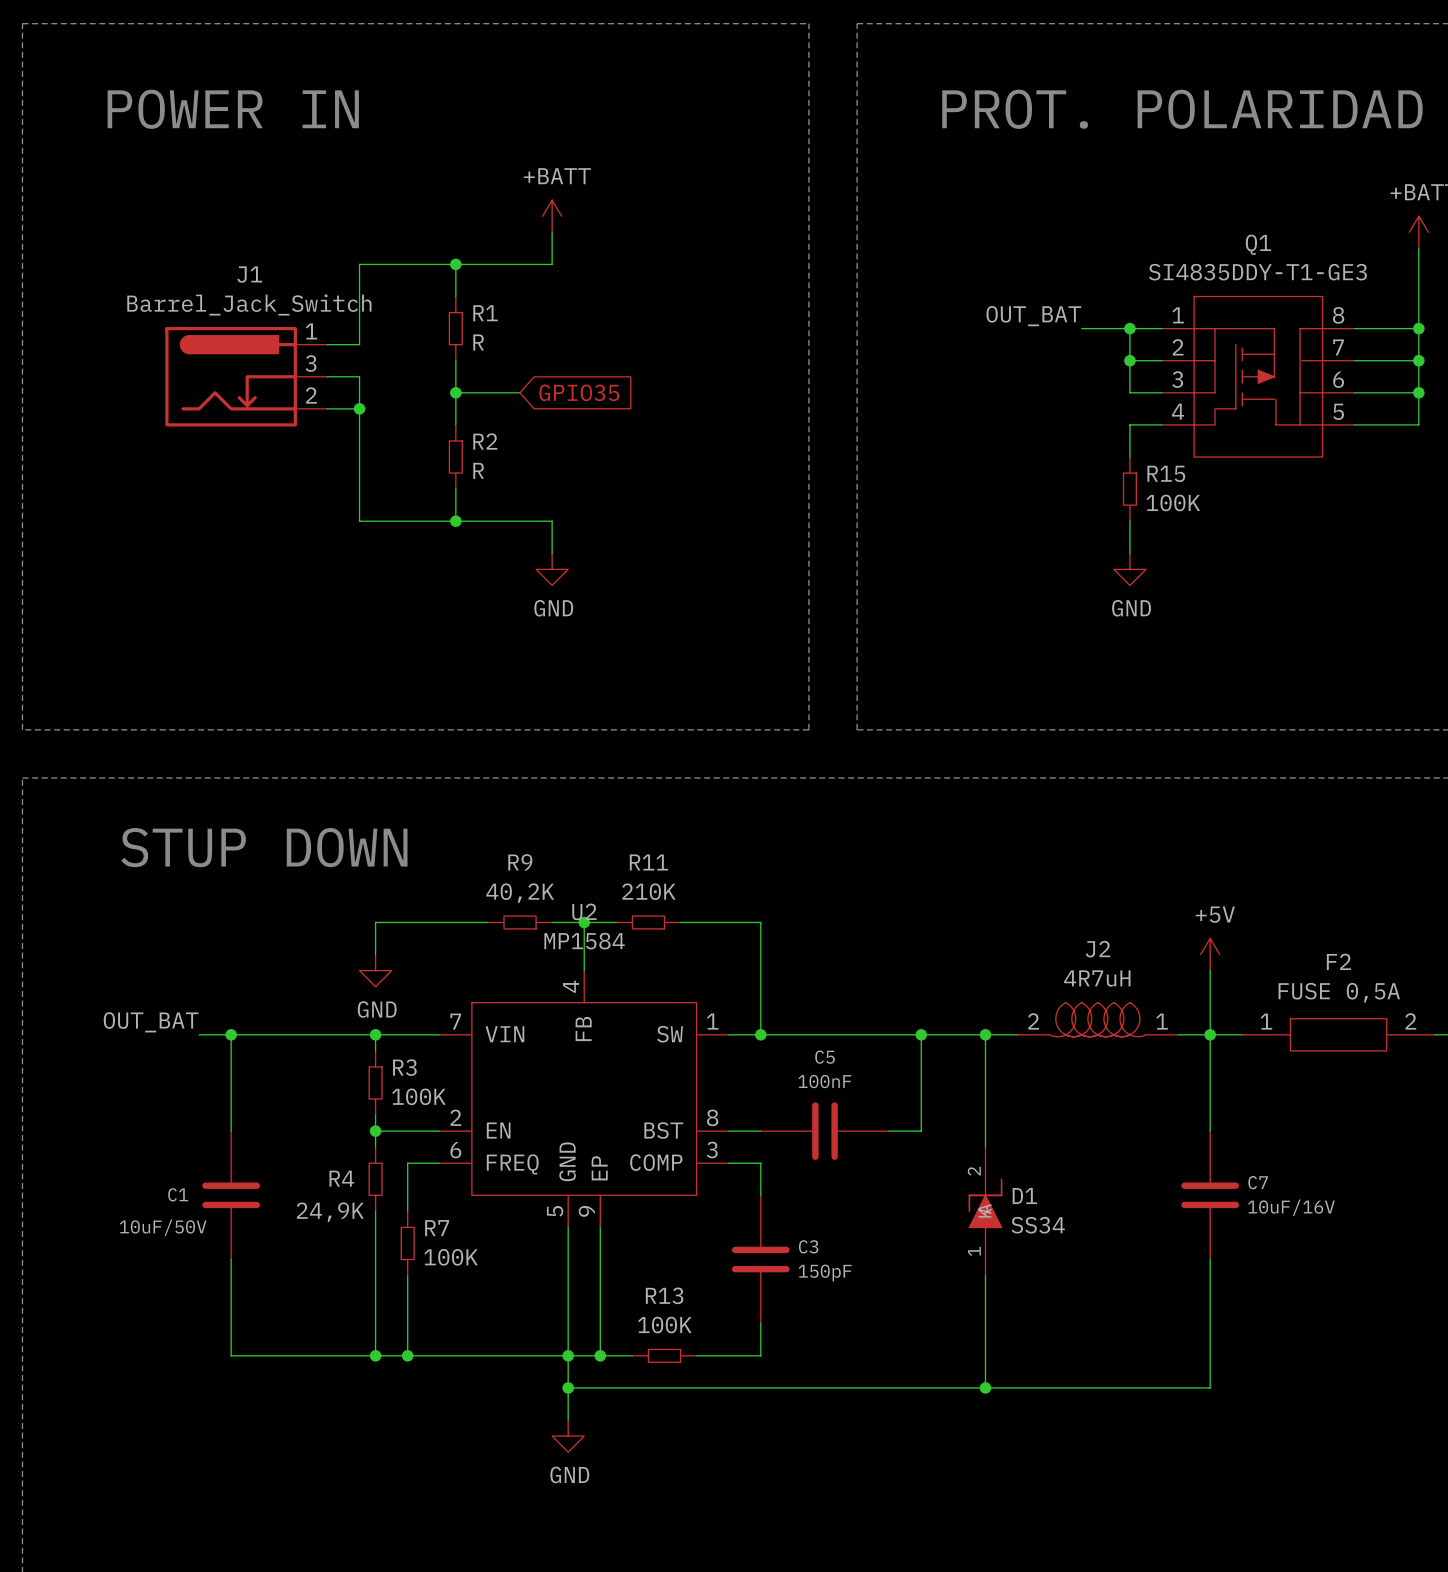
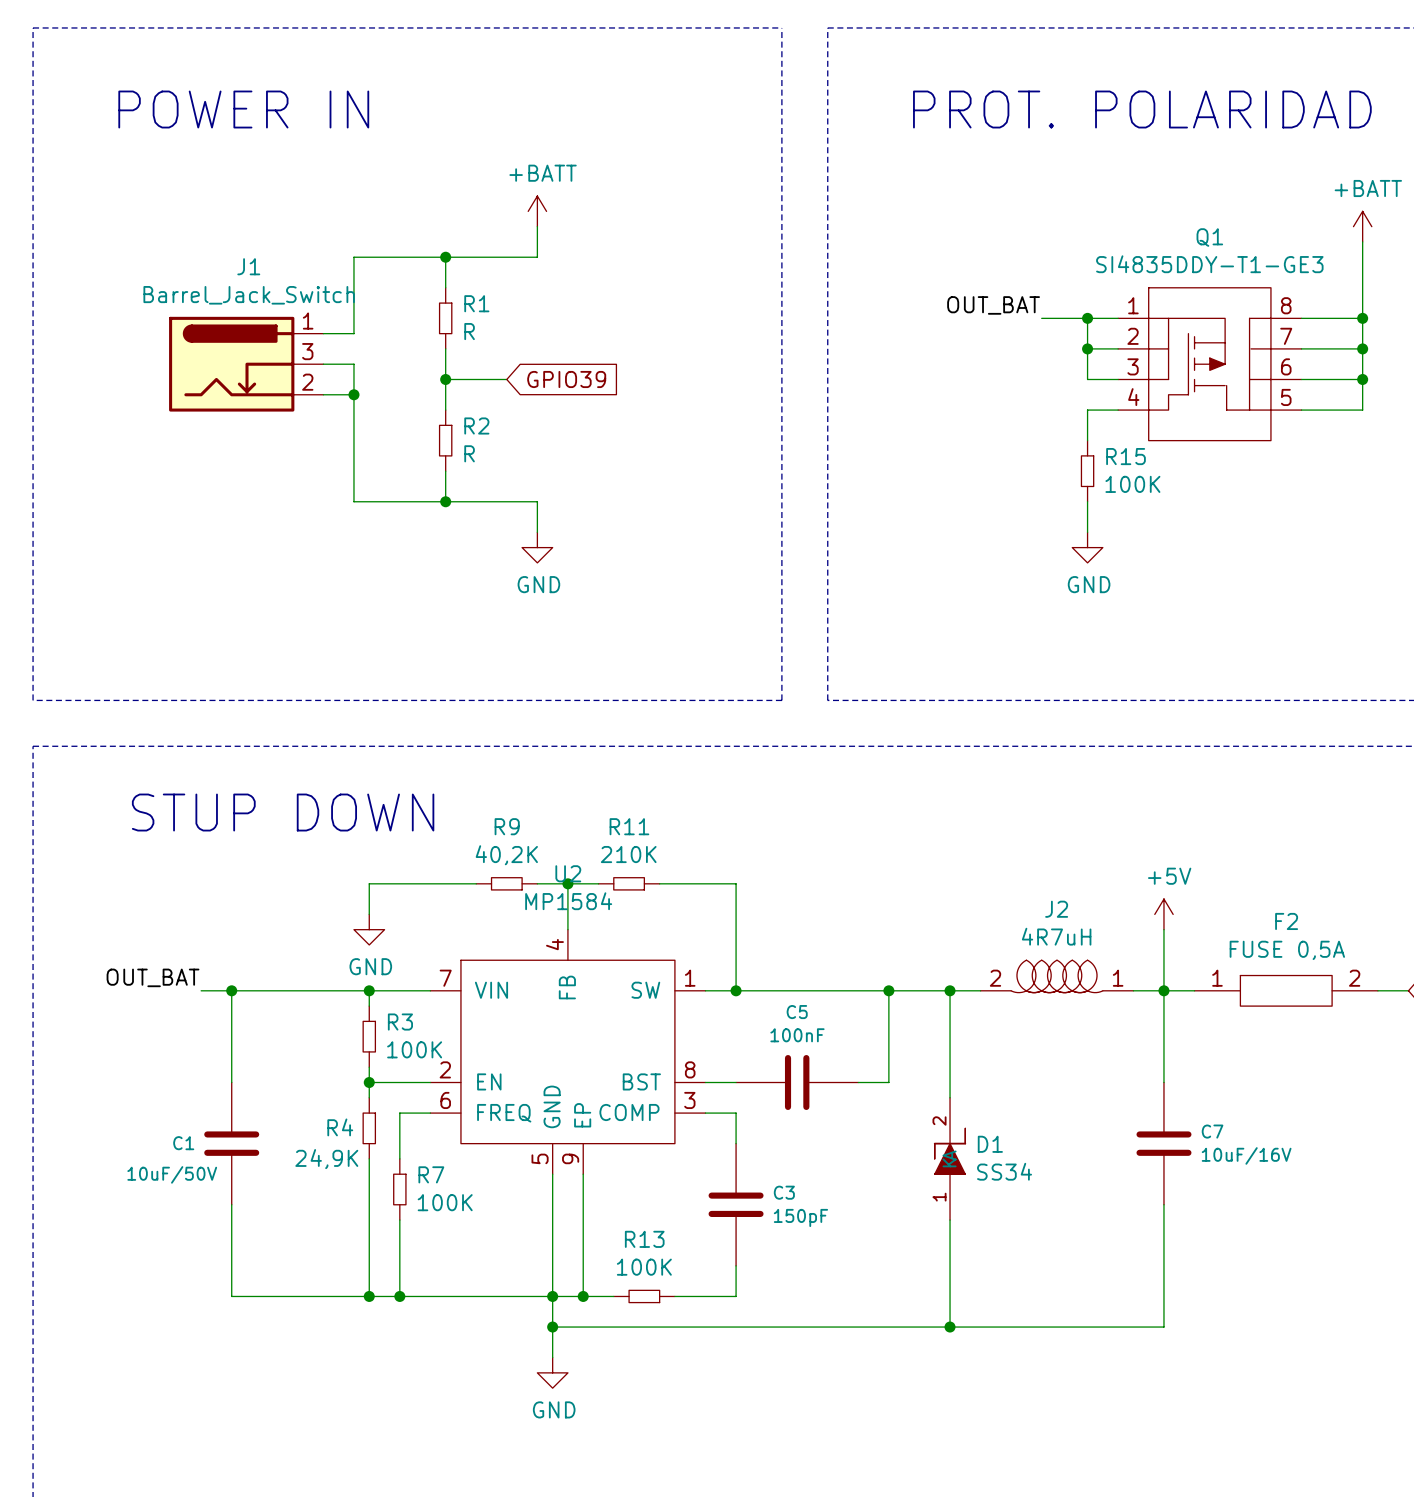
global label: GPIO35 (579, 392) -> GPIO39 (566, 379)

